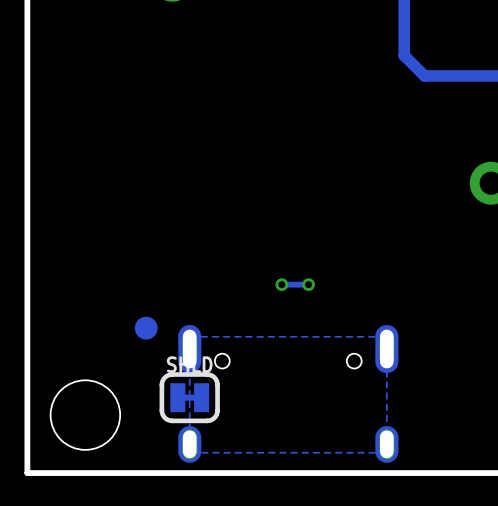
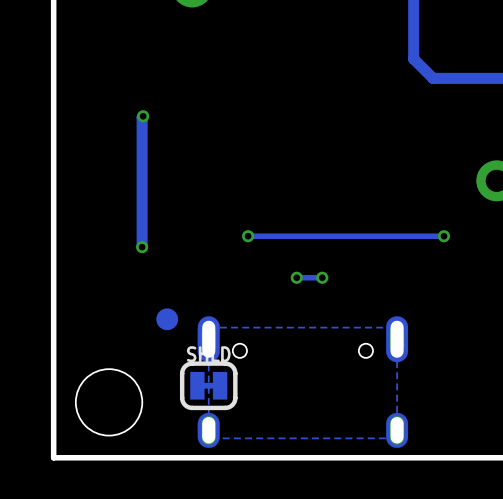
track: none -> (143, 116) (142, 247)
via: none -> (143, 116)
via: none -> (248, 236)
track: none -> (444, 236) (248, 236)
via: none -> (444, 236)
via: none -> (142, 247)

